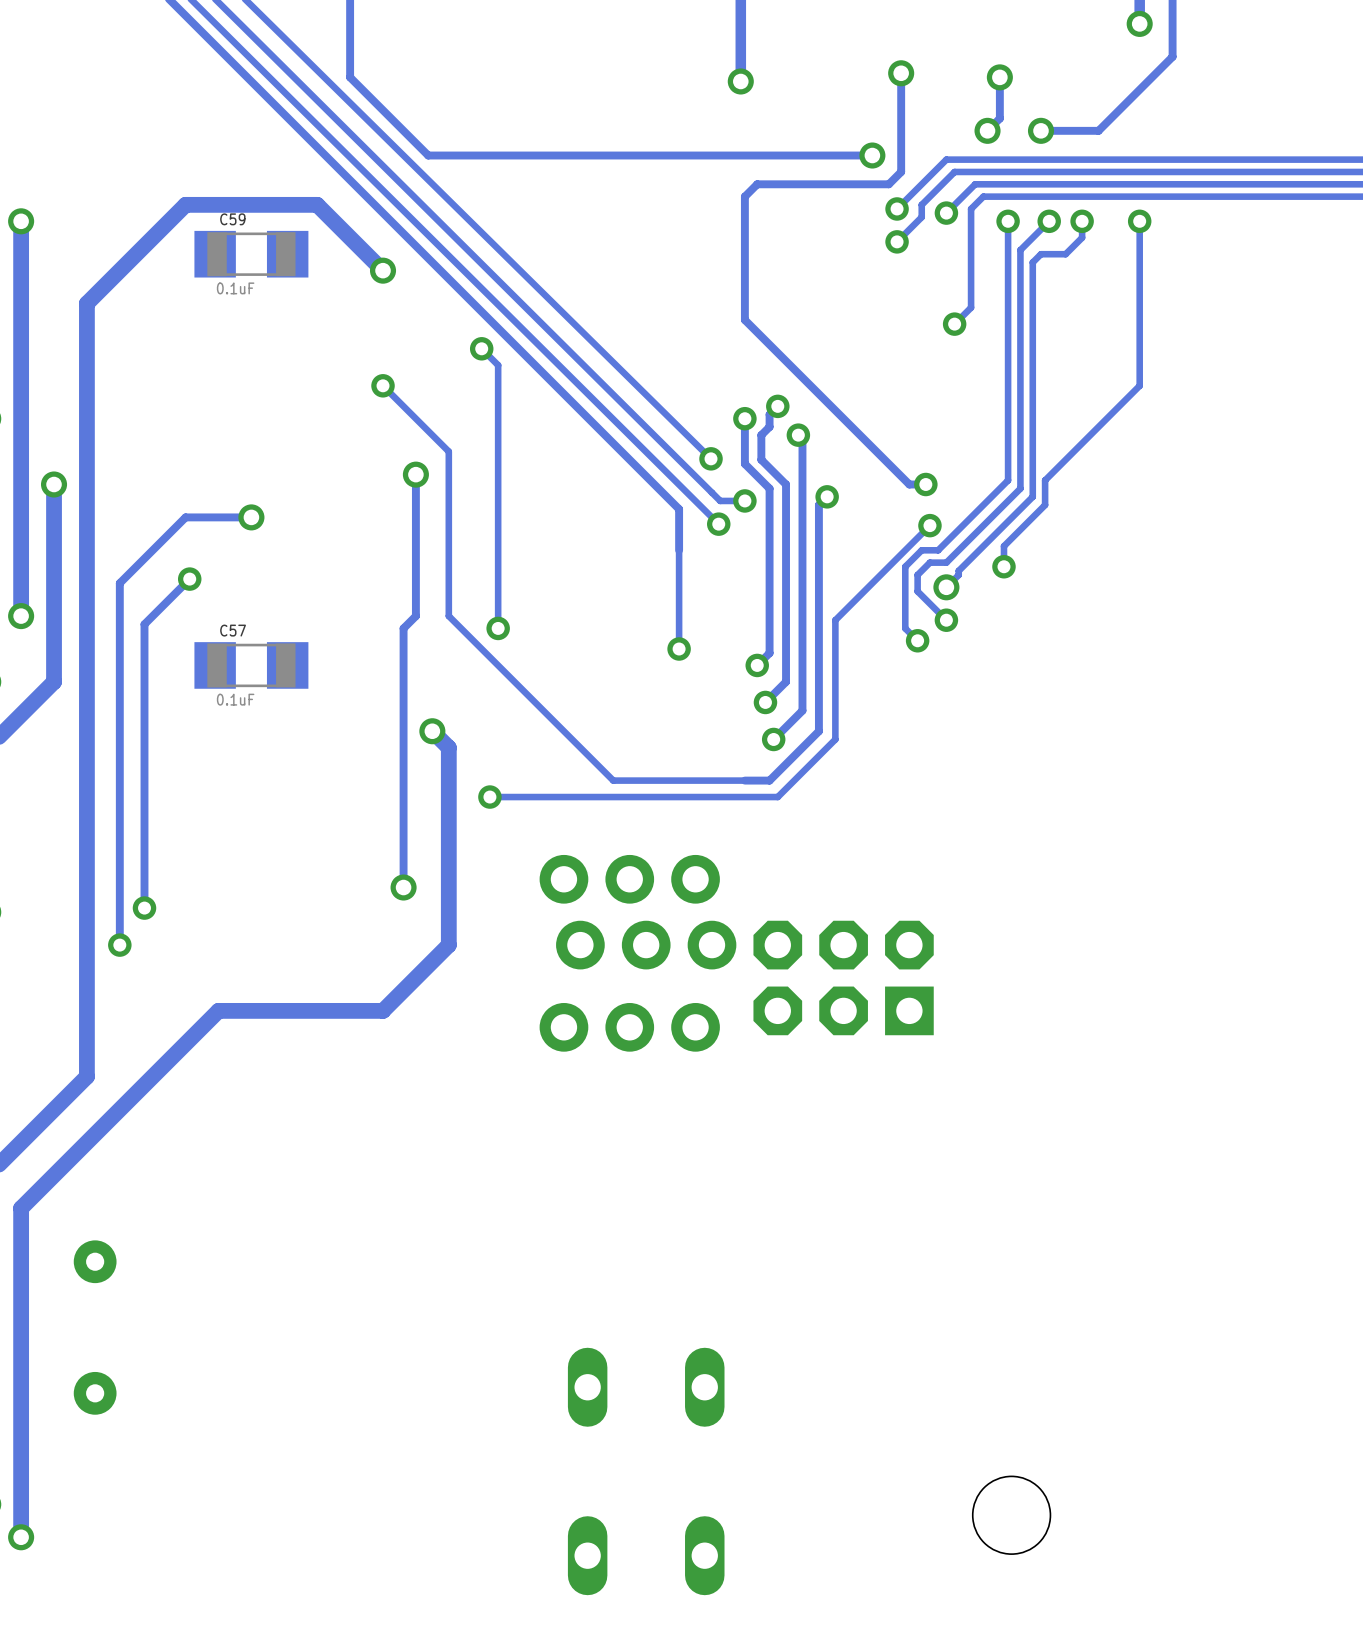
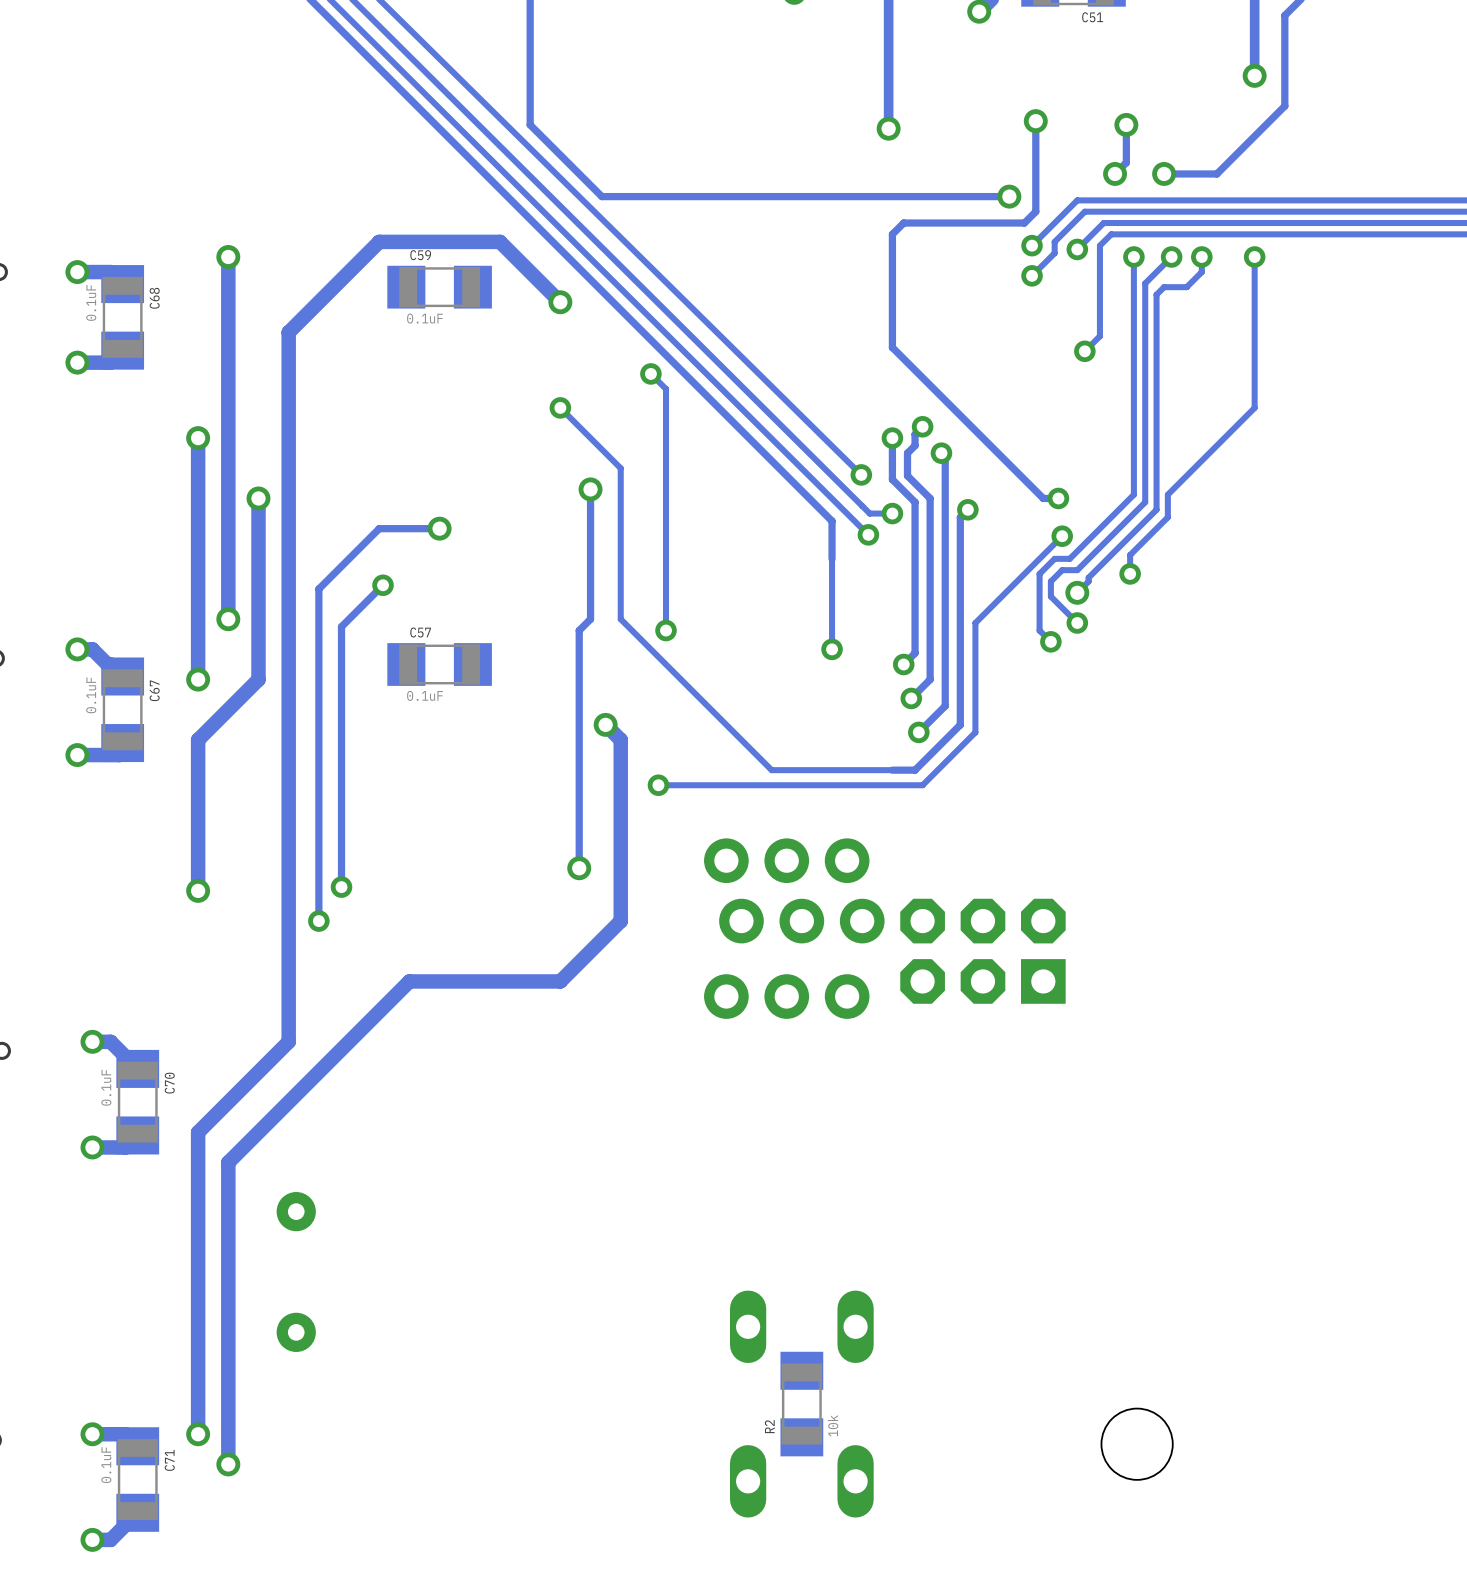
R2: none -> 10k (801, 1404)

